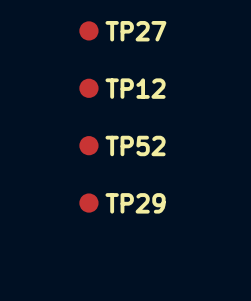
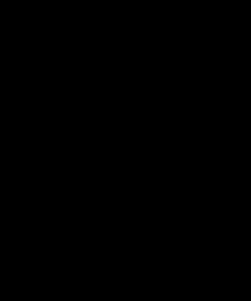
TP27: (88, 30) -> none
TP12: (88, 88) -> none
TP52: (88, 145) -> none
TP29: (88, 203) -> none

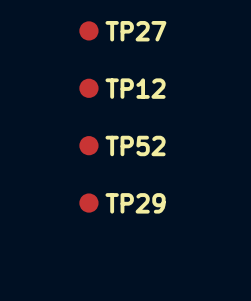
TP27: none -> (88, 30)
TP12: none -> (88, 88)
TP52: none -> (88, 145)
TP29: none -> (88, 203)

